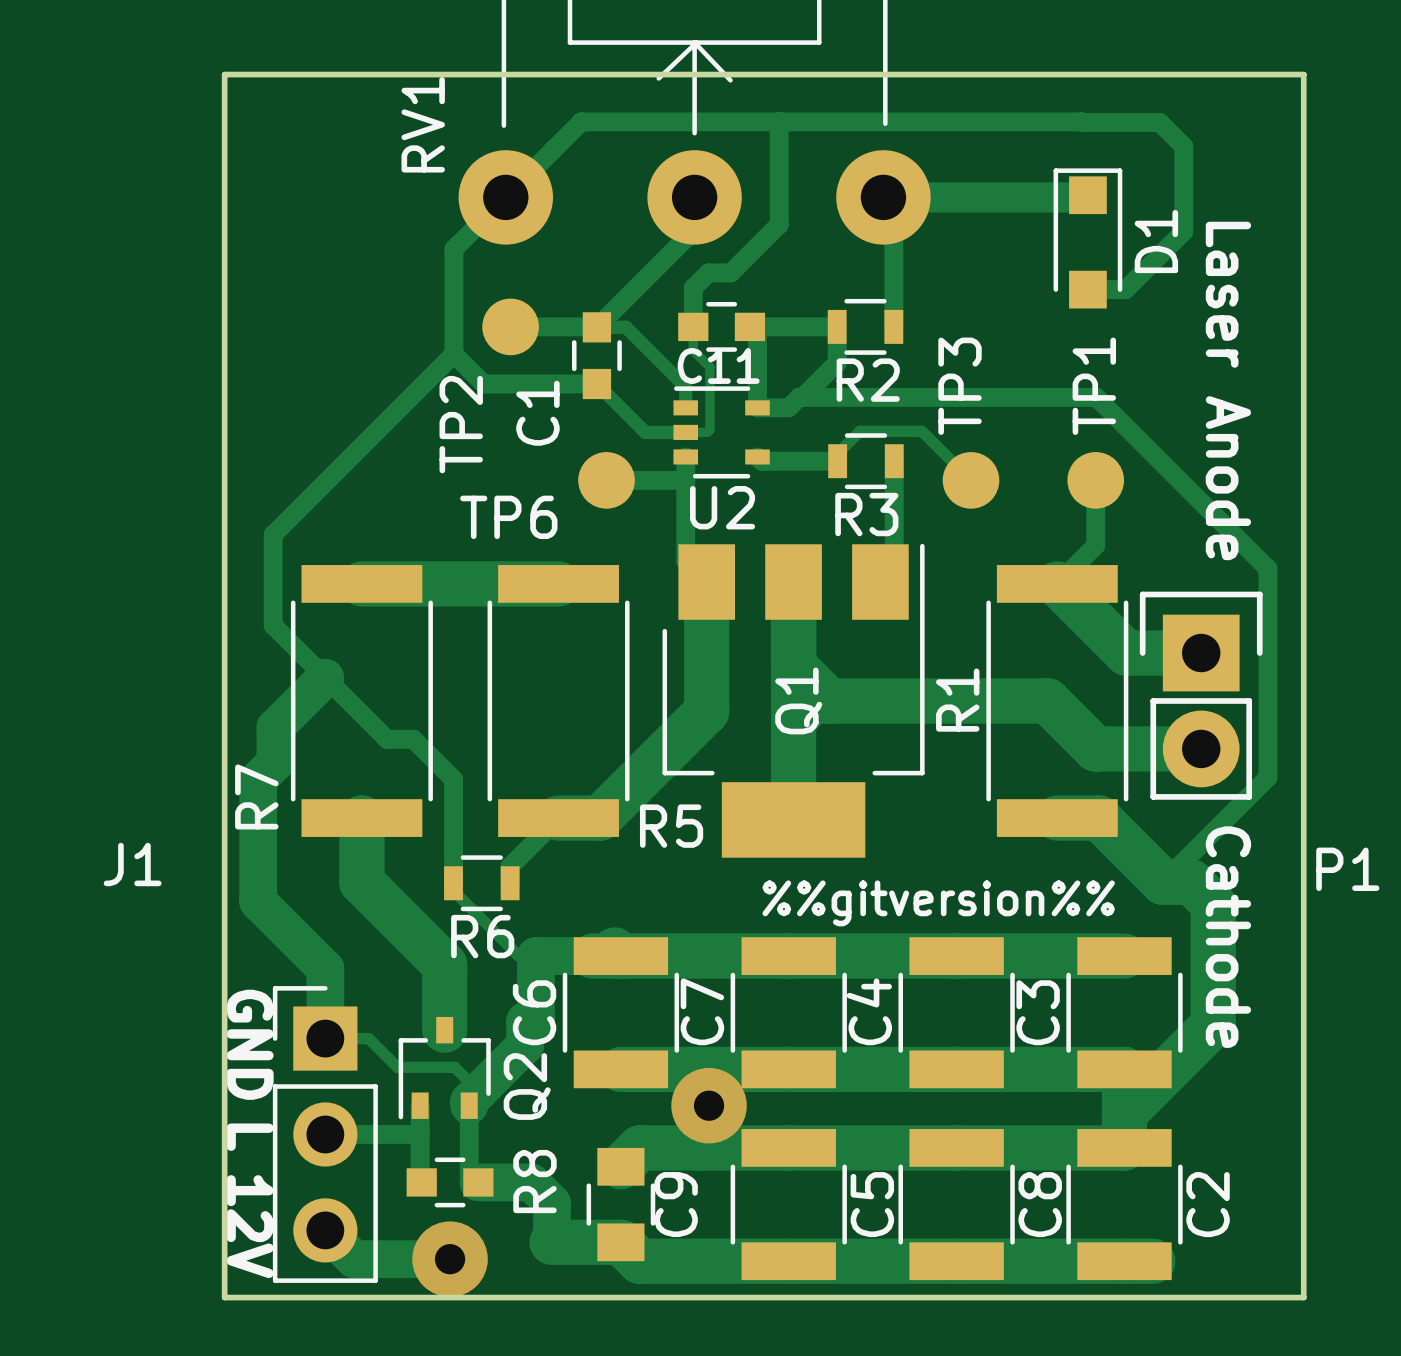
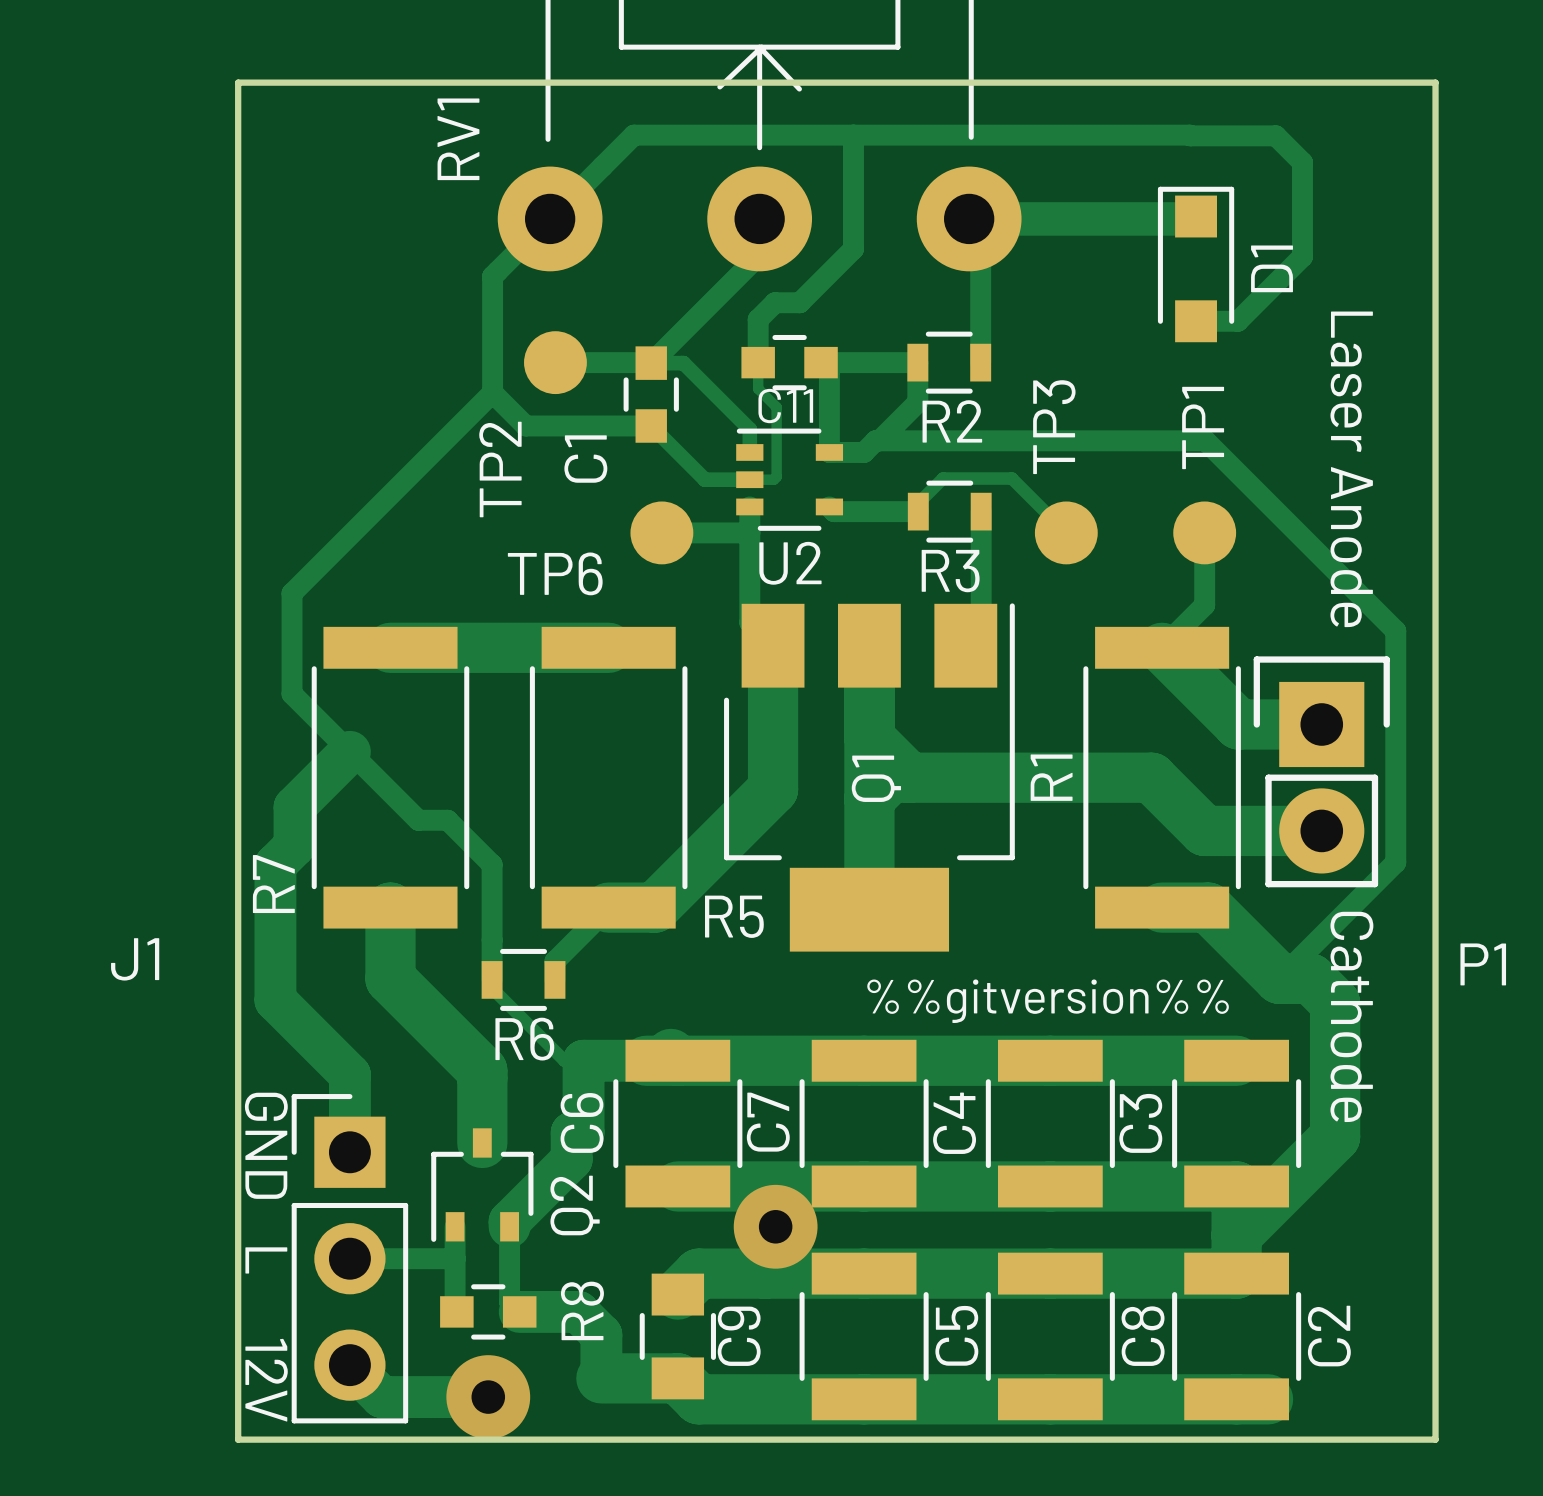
track: (325, 1038) (368, 1038) (397, 1067) (454, 1067) (478, 1091) -> none

